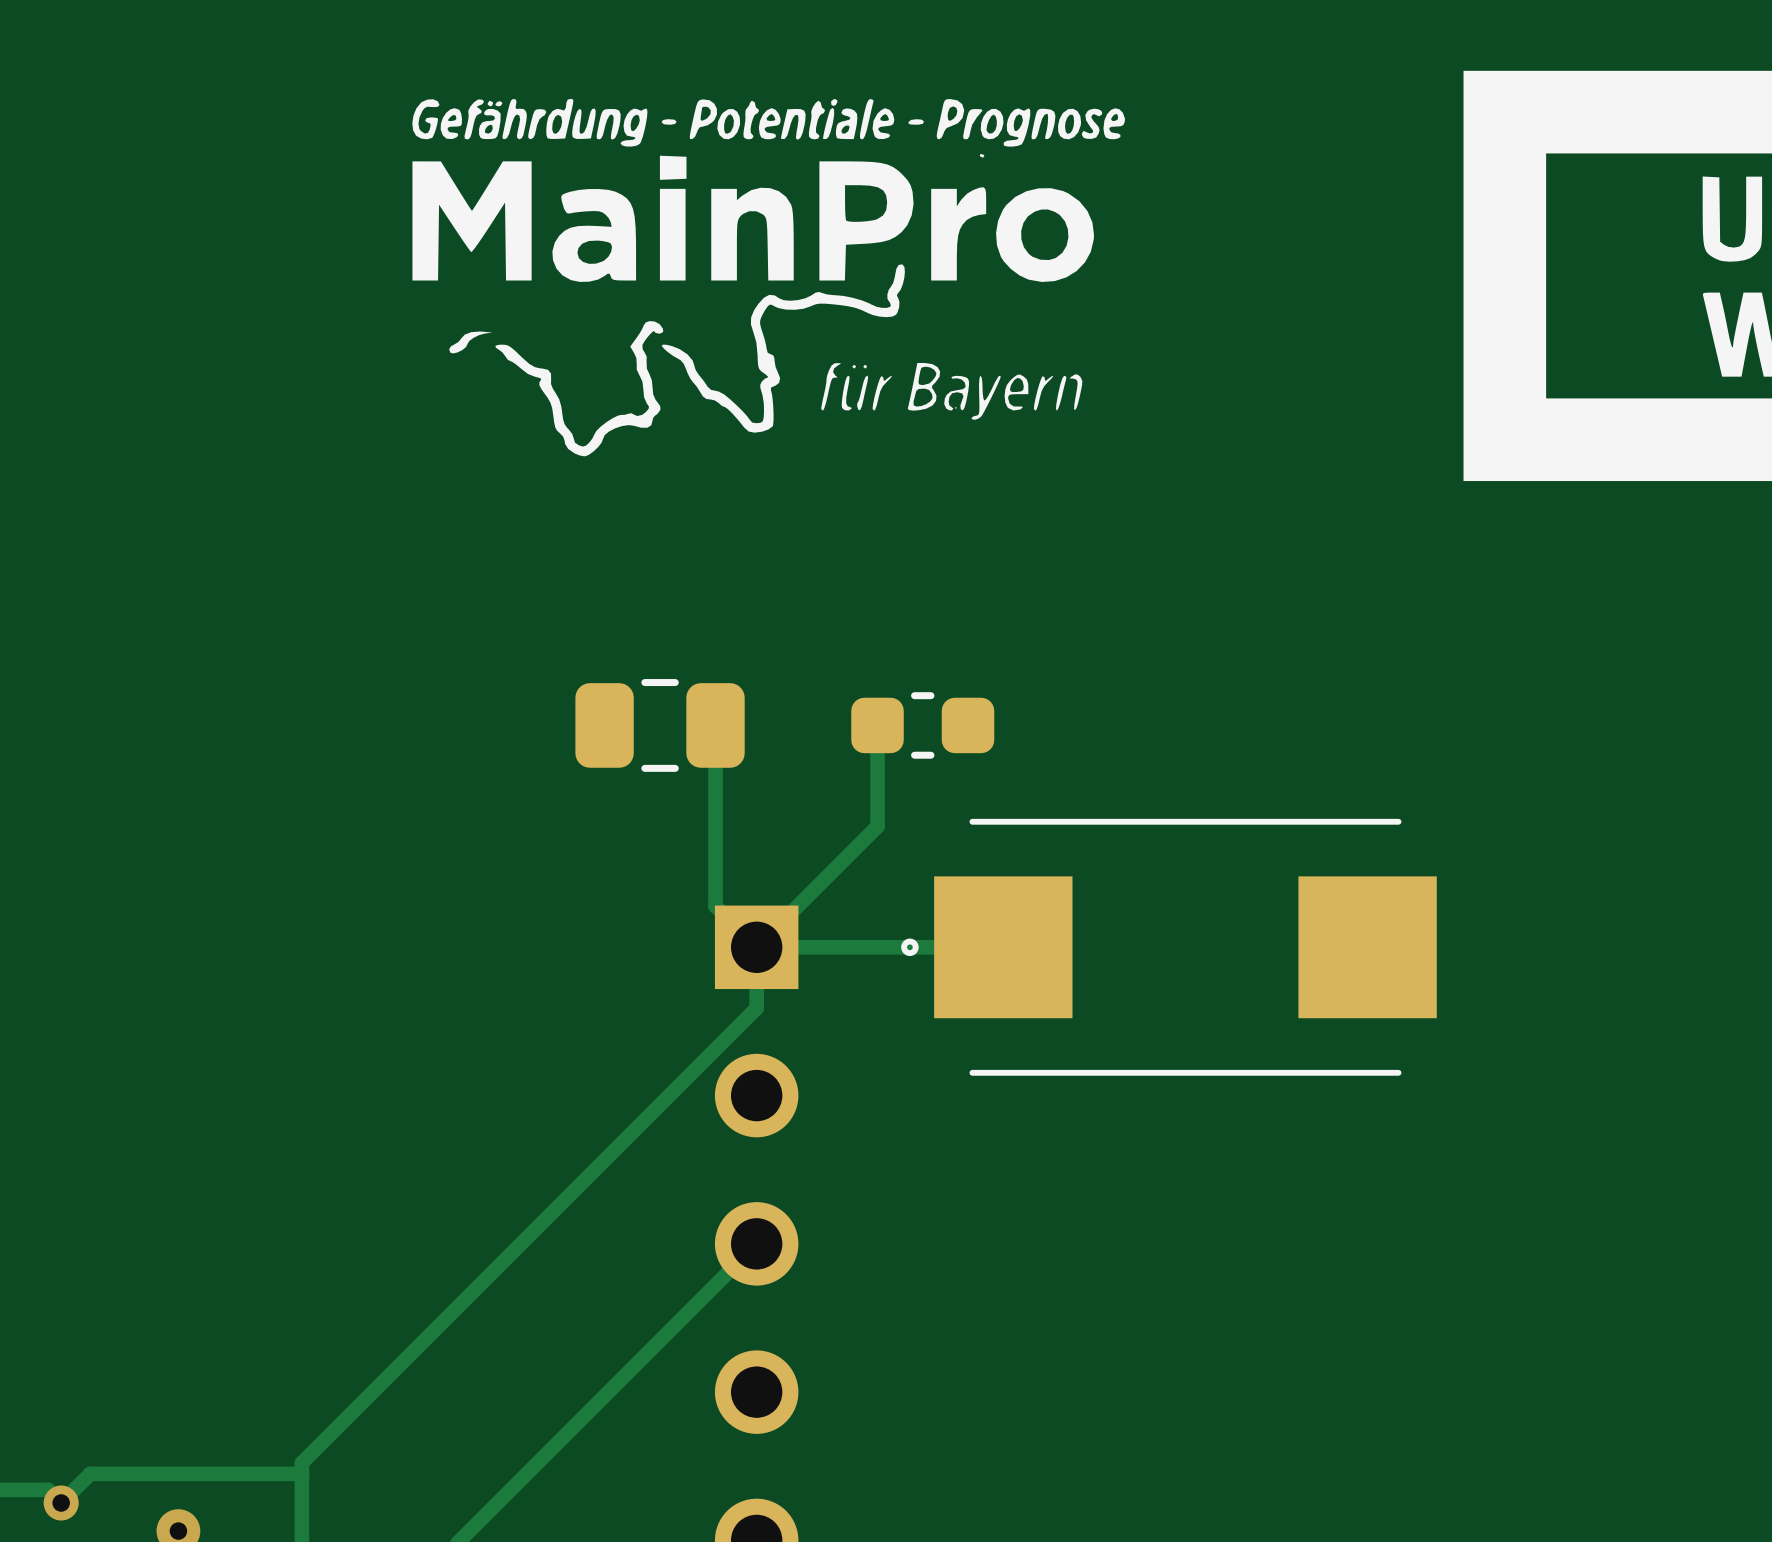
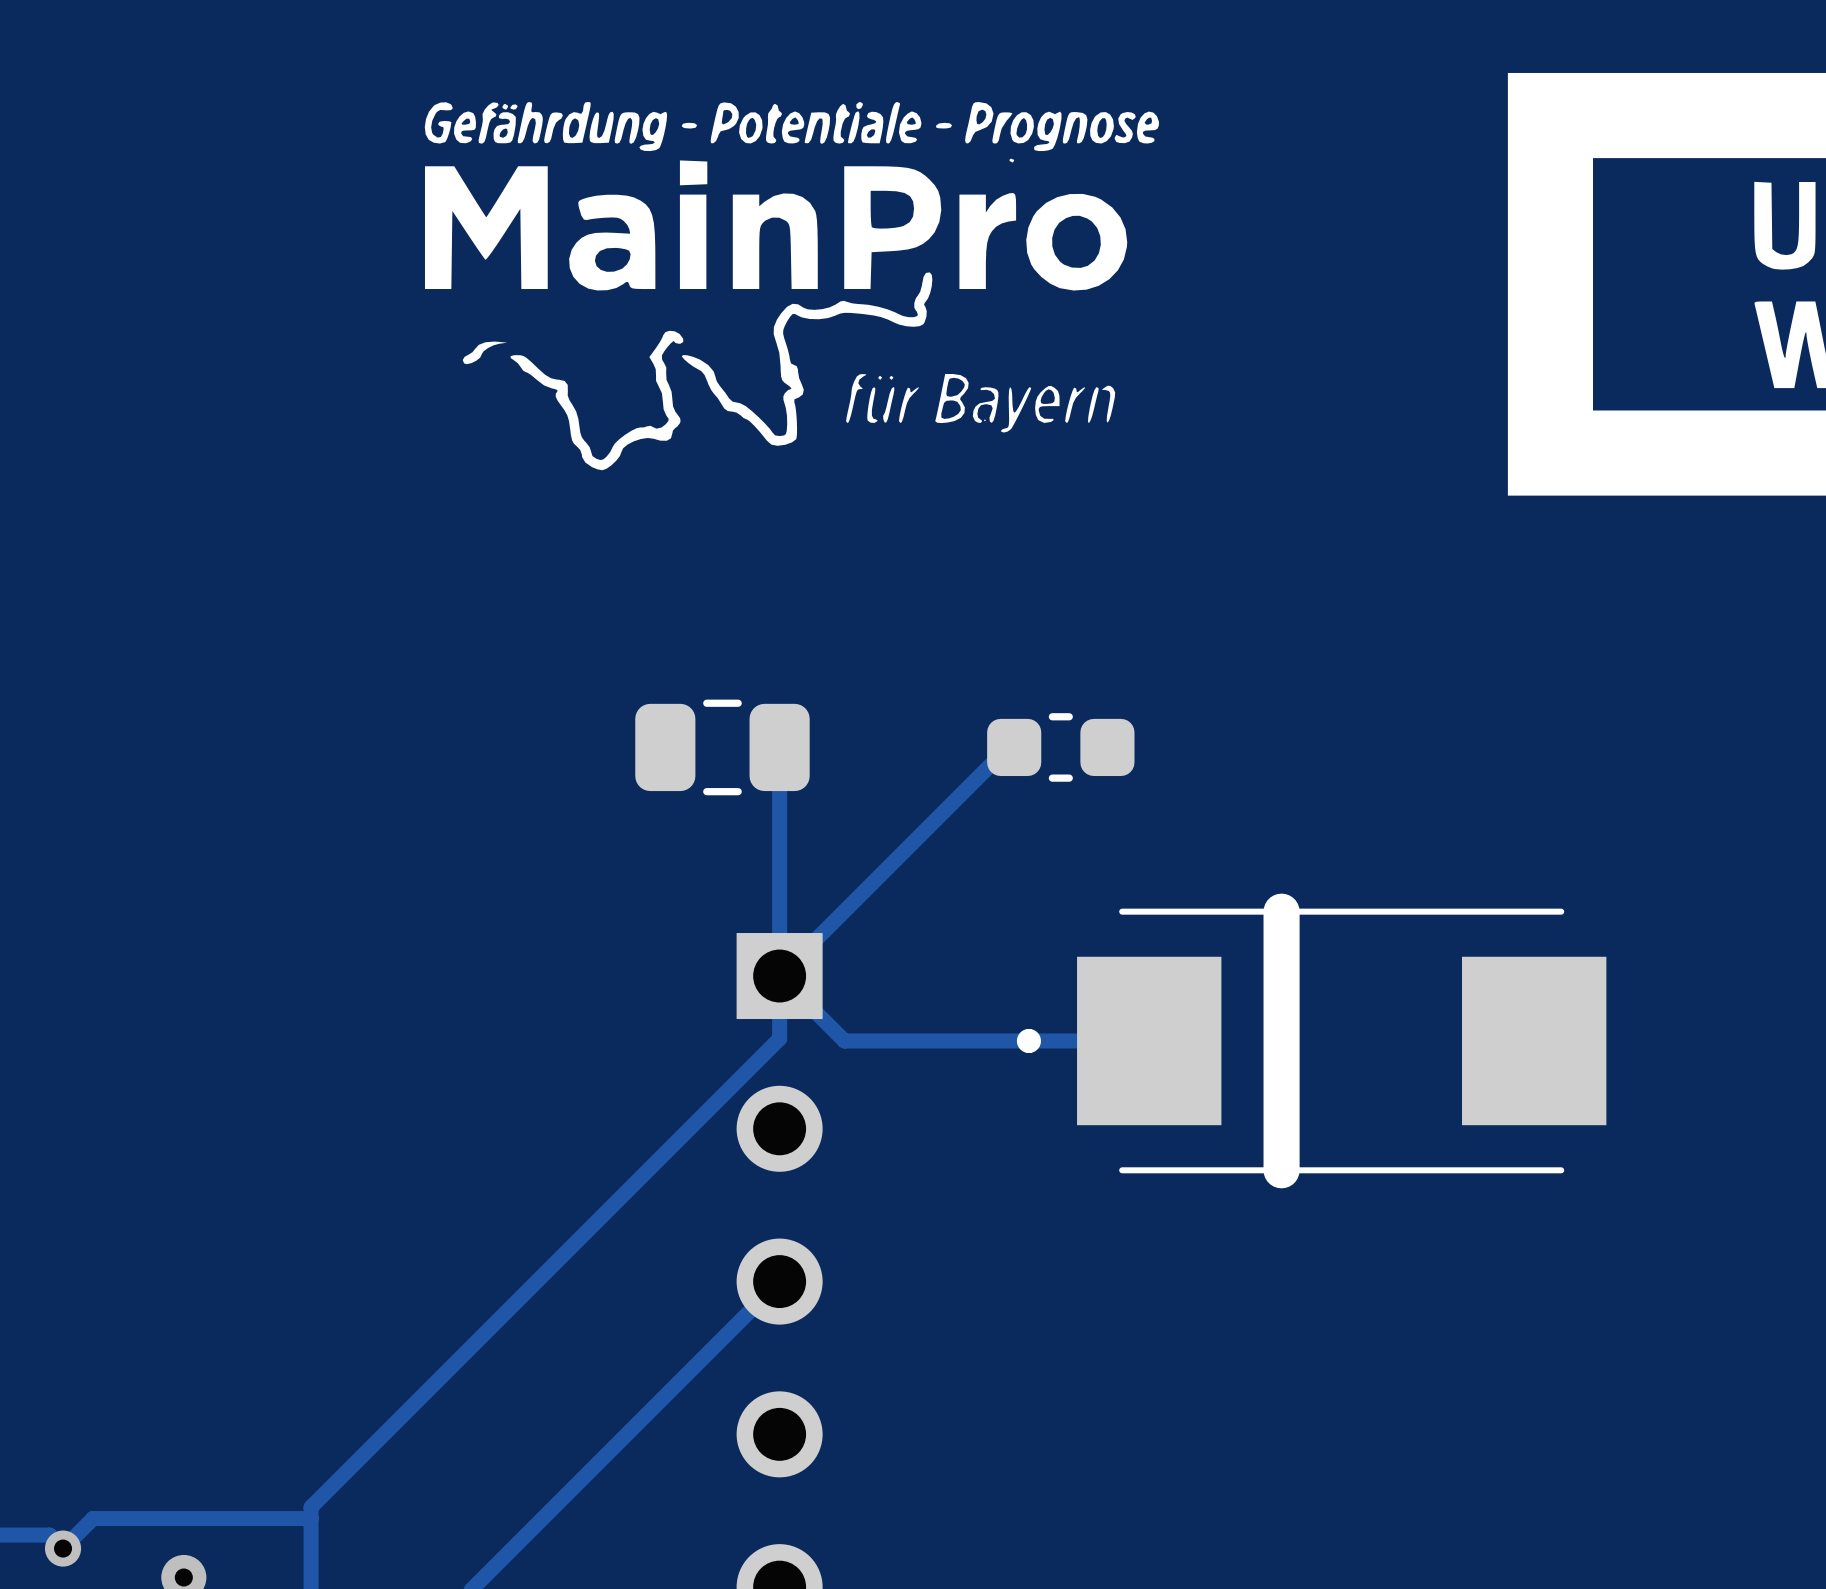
part position: (660, 725) -> (722, 747)
track: (715, 725) (715, 906) (756, 947) (1003, 947) -> none
track: none -> (779, 747) (779, 976) (844, 1040) (1149, 1040)
track: (877, 725) (877, 826) -> (1014, 747) (1008, 747) (904, 851)
part position: (922, 725) -> (1060, 747)
part: (1168, 947) -> none
part: none -> (1311, 1040)

